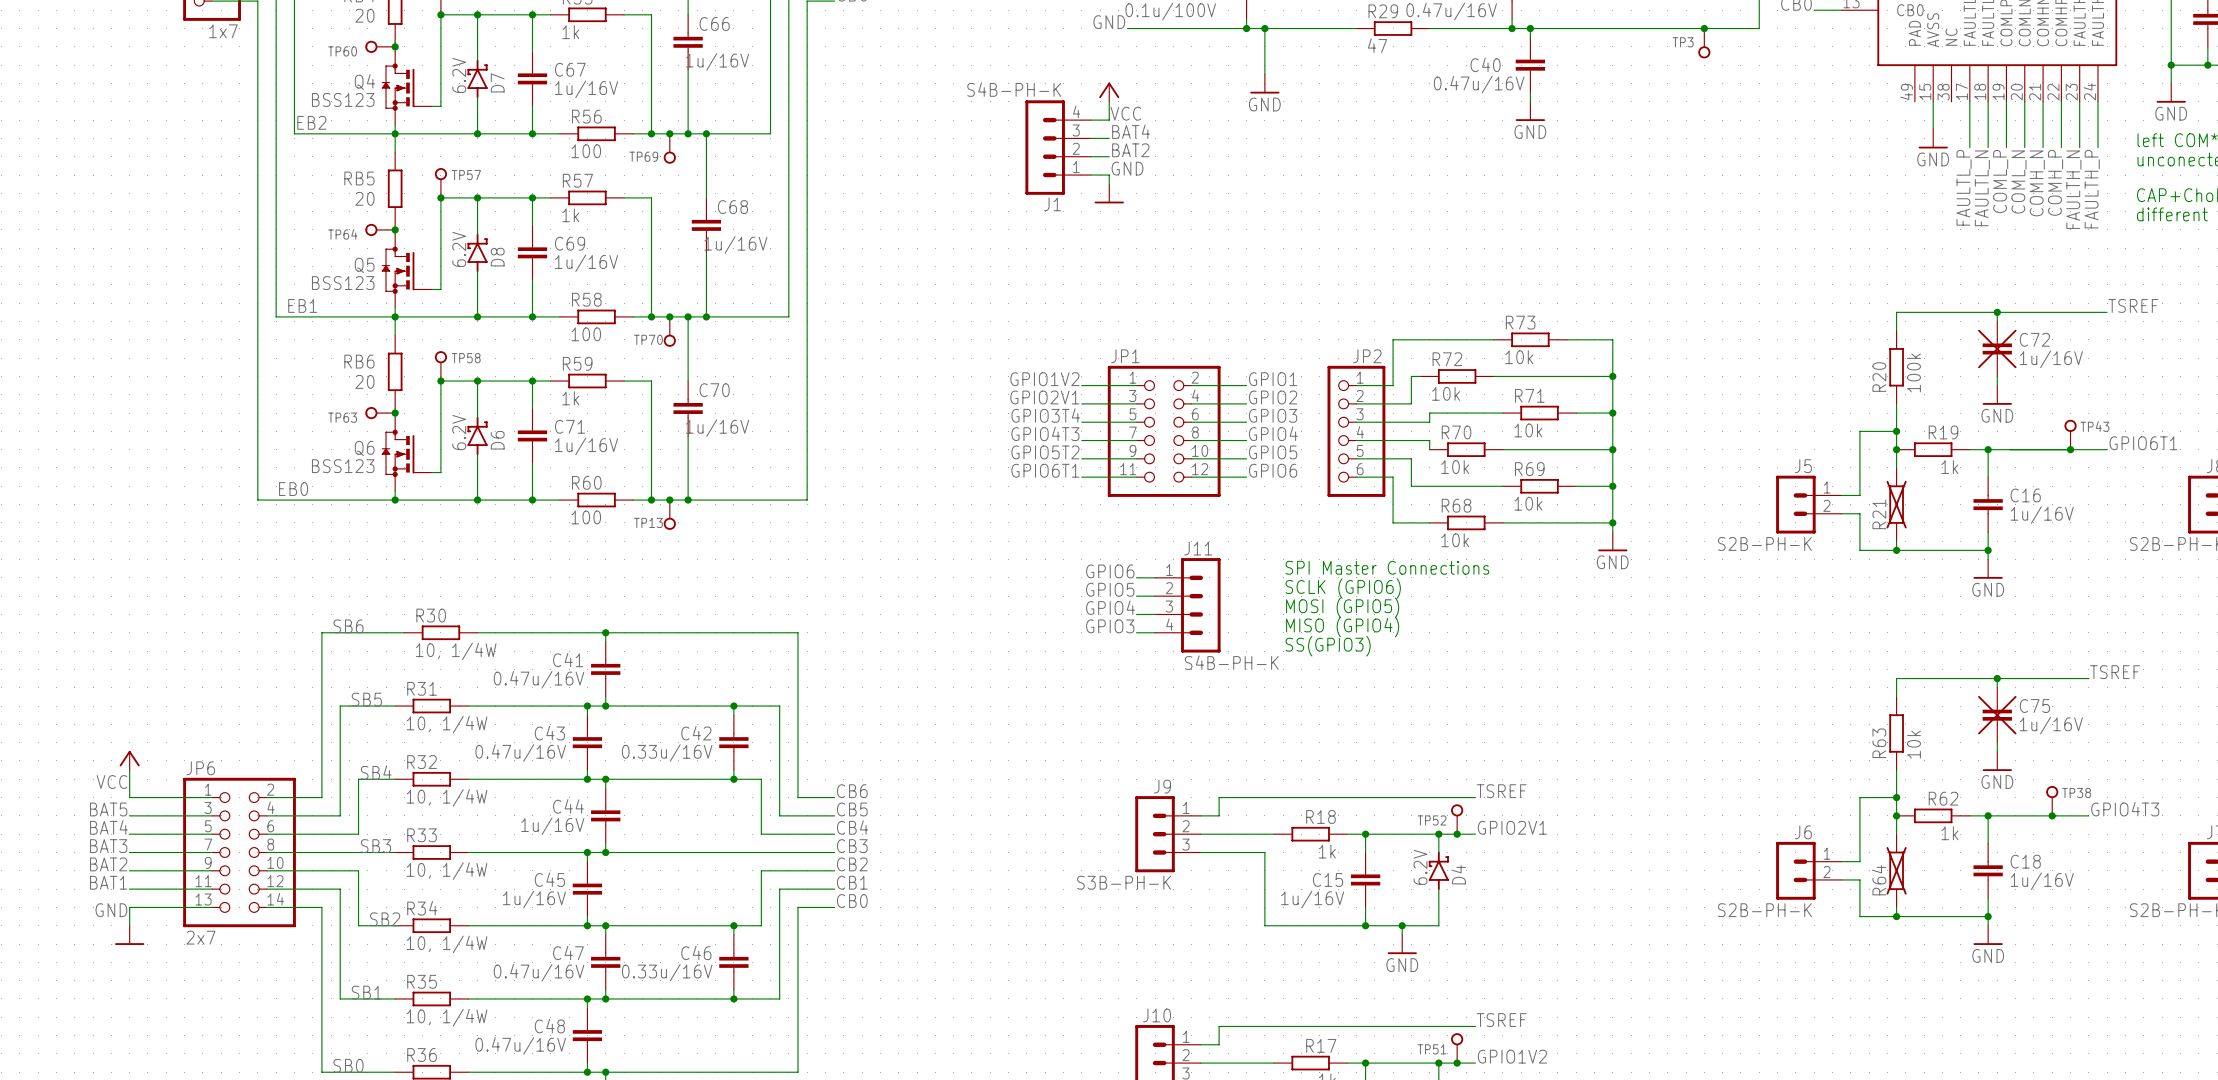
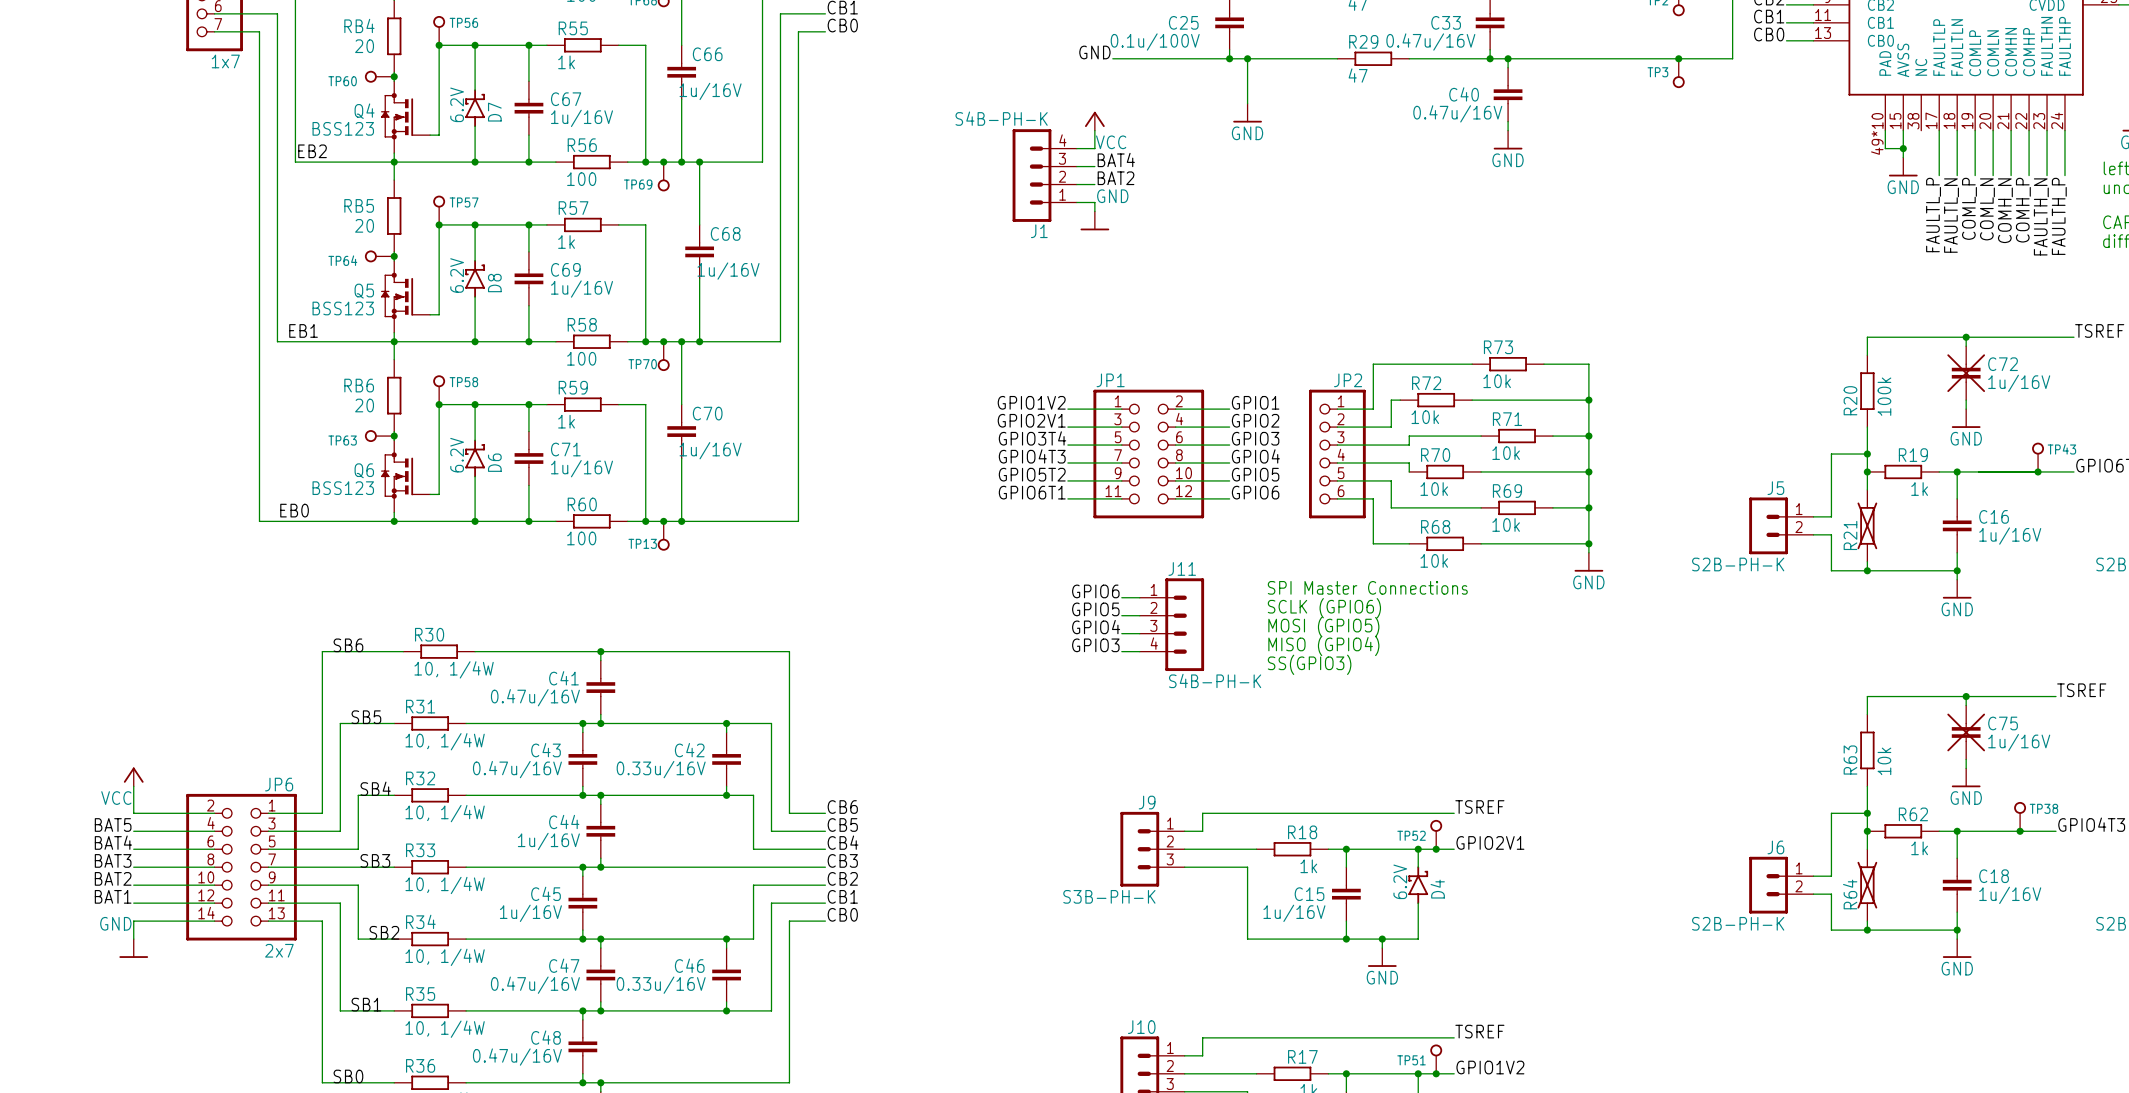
part pin number: 49 (1906, 91) -> 49*10 (1877, 133)
wire: none -> (1885, 130) (1885, 148) (1903, 148)
junction: none -> (1903, 148)
JP6 flip: as is (239, 852) -> left-right (241, 867)

